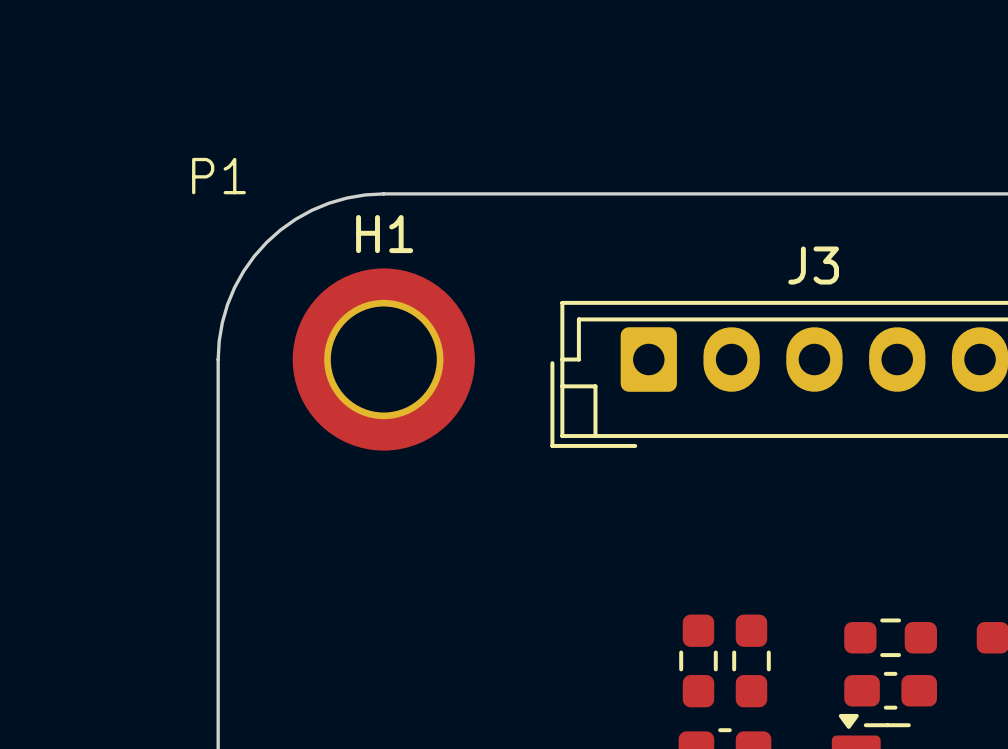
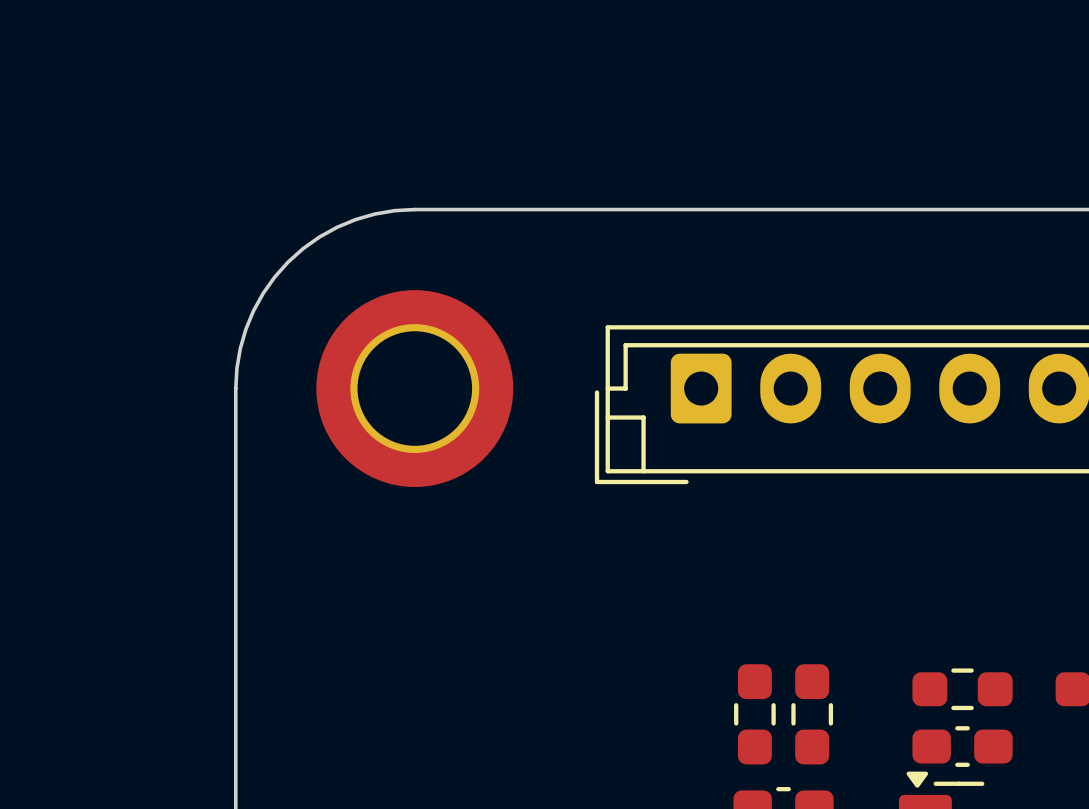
P1: (218, 176) -> none
H1 name: H1 (384, 234) -> none
J3 name: J3 (813, 265) -> none

